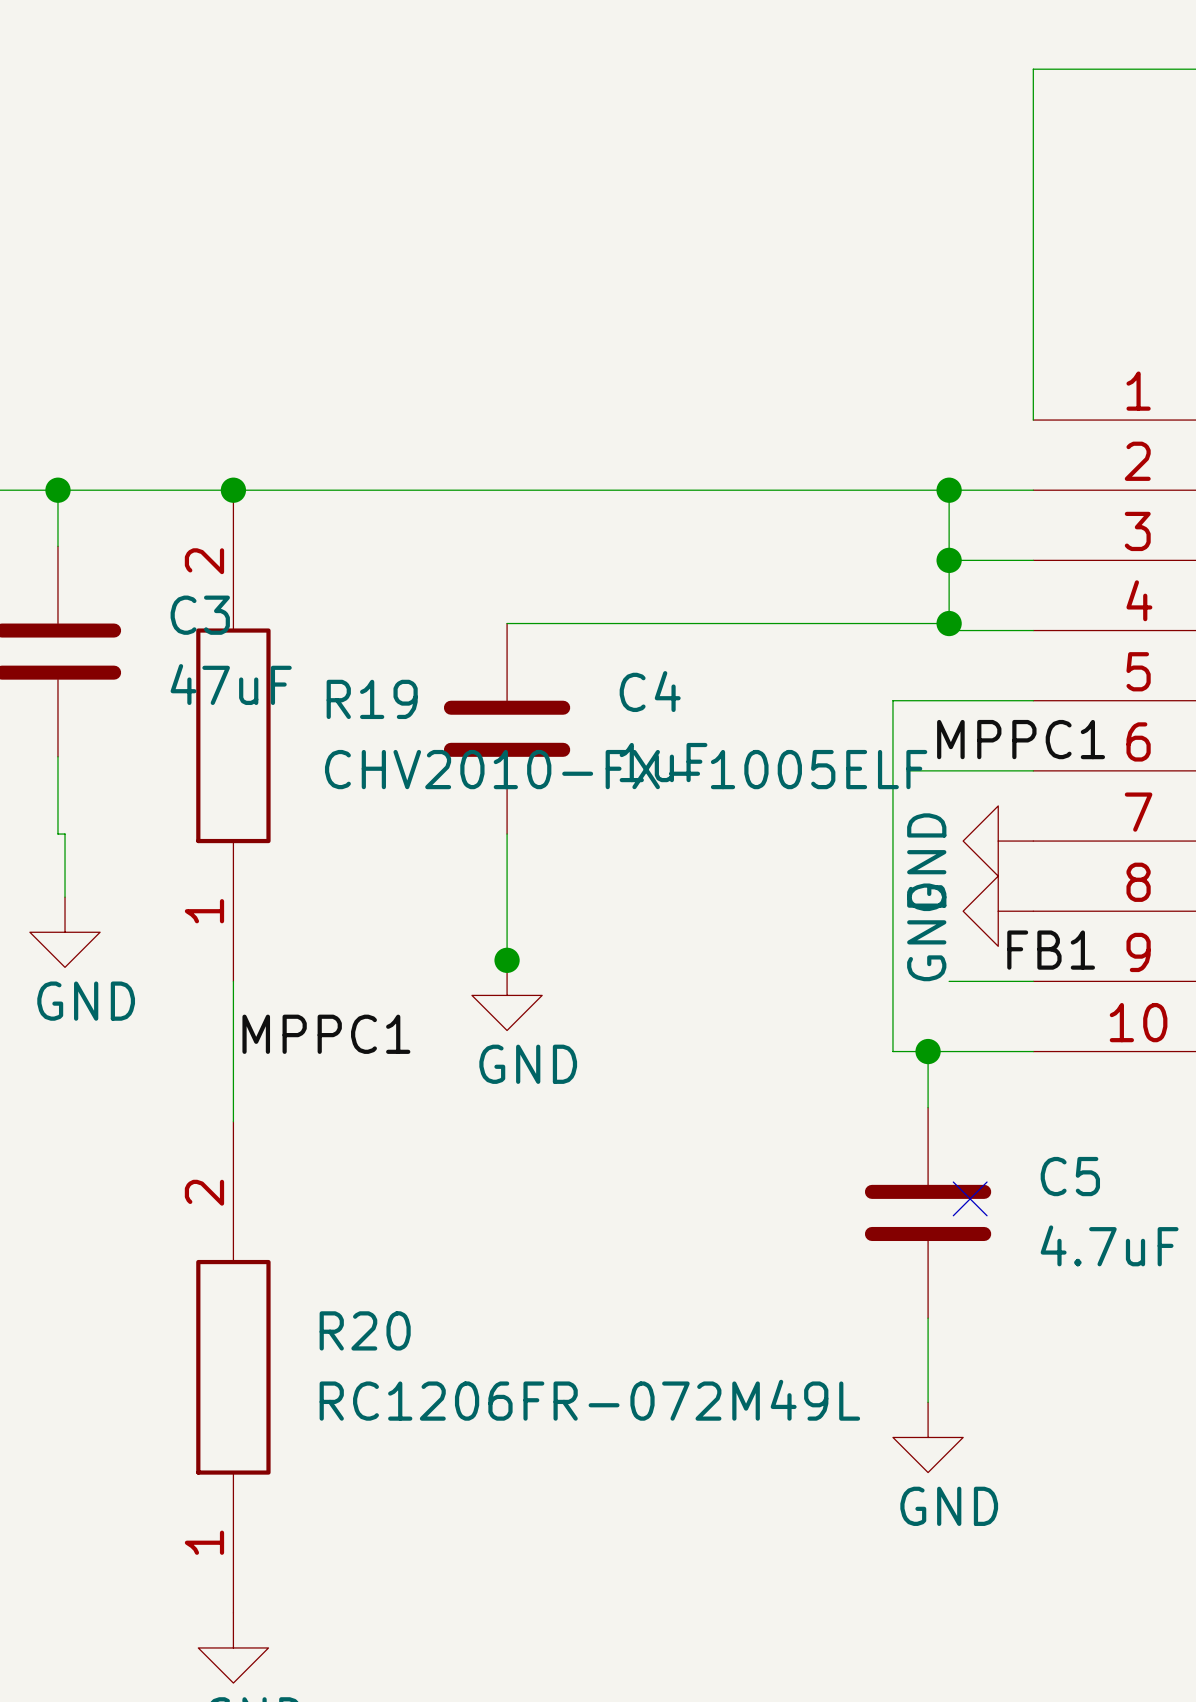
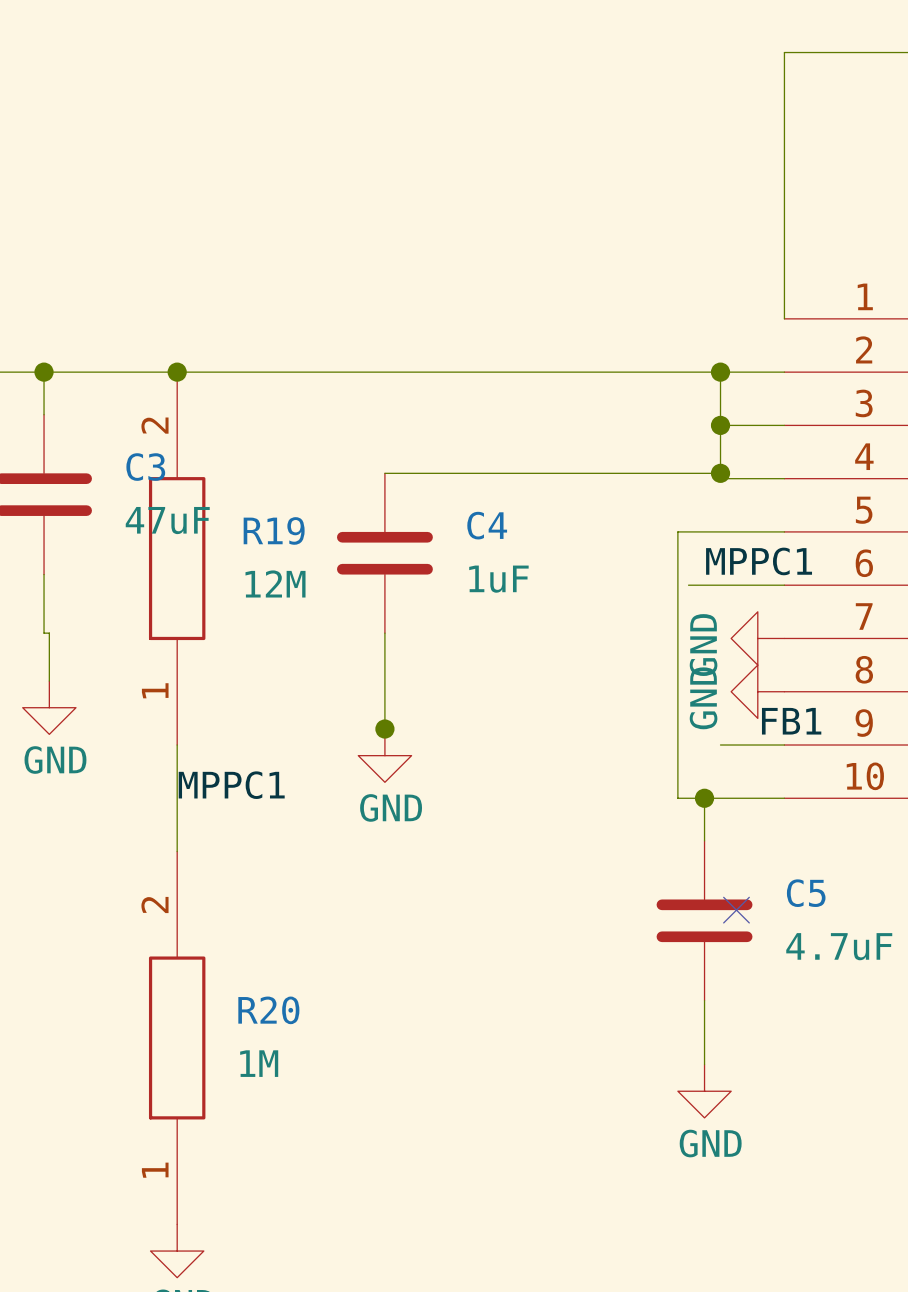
R19 value: CHV2010-FX-1005ELF (626, 769) -> 12M (275, 583)
R20 value: RC1206FR-072M49L (589, 1400) -> 1M (259, 1063)

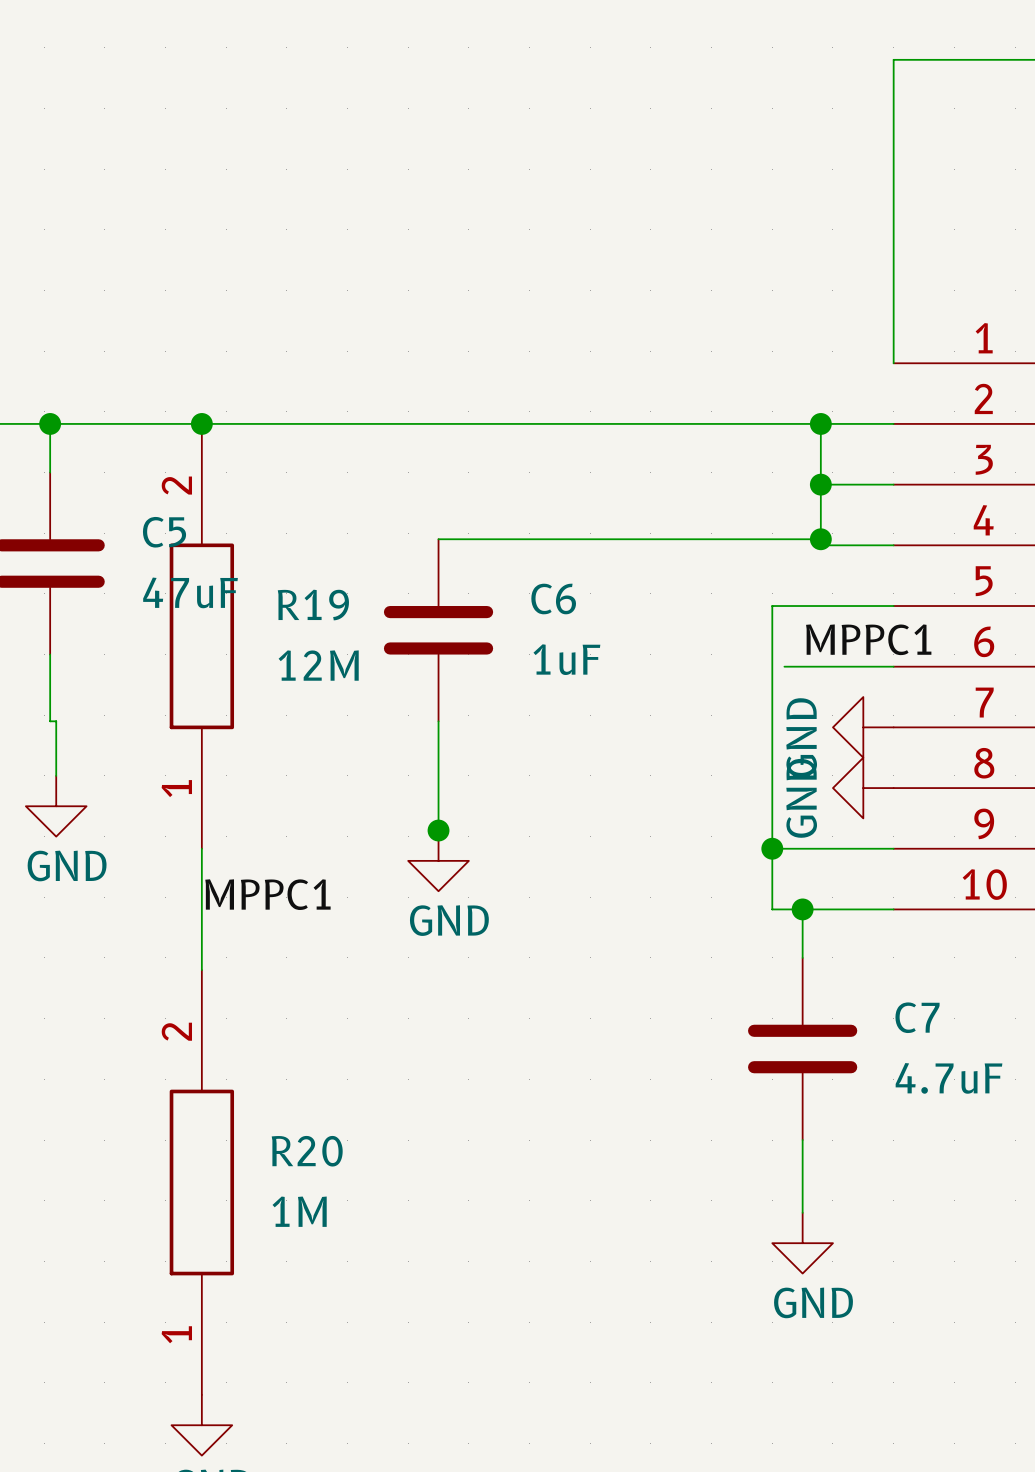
C3 name: C3 (145, 467) -> C5 (164, 532)
C4 name: C4 (487, 525) -> C6 (553, 599)
label: FB1 (791, 721) -> none
wire: none -> (772, 848) (820, 848)
junction: none -> (772, 848)
C5 name: C5 (806, 893) -> C7 (917, 1017)
no-connect mark: (736, 910) -> none

